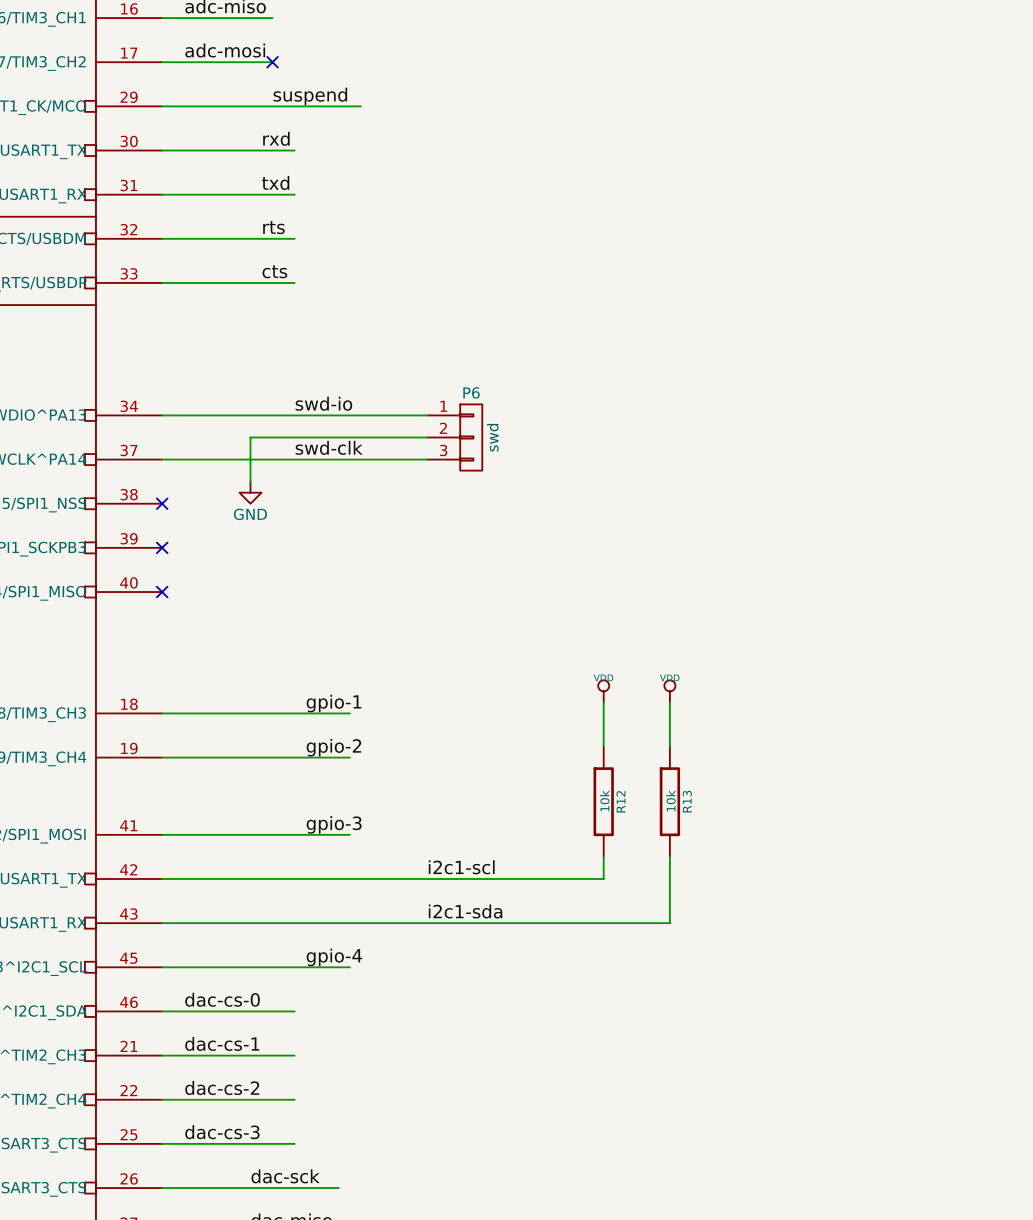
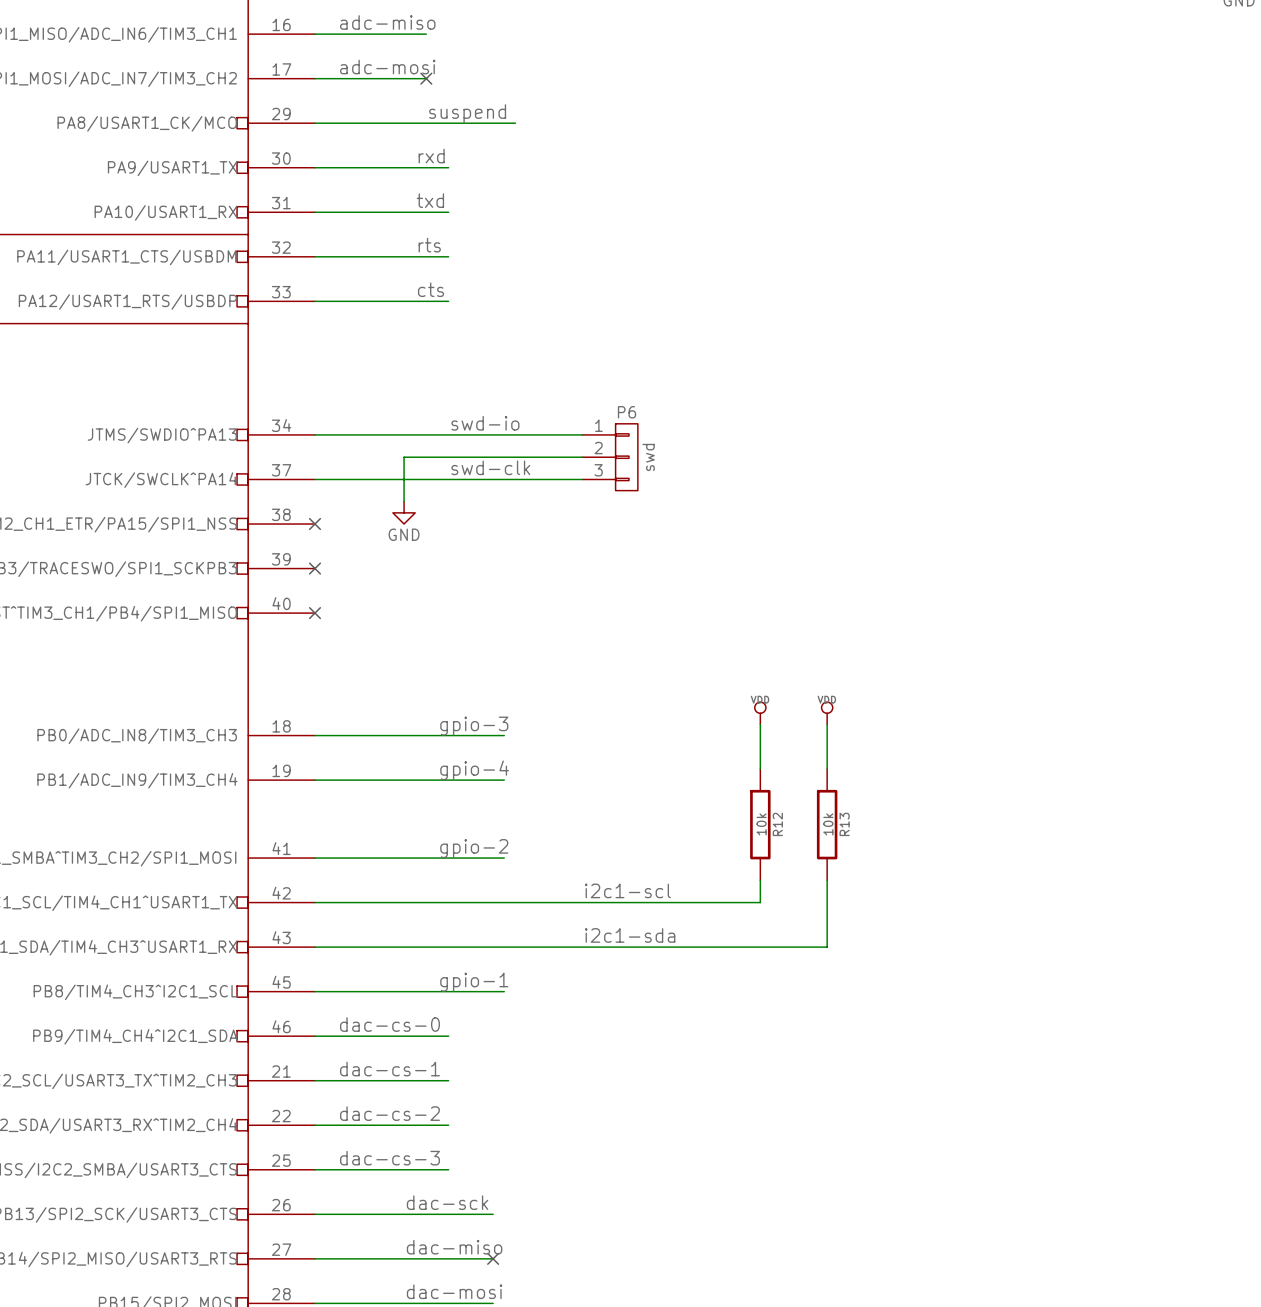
label: gpio-1 (334, 703) -> none
label position: gpio-2 (333, 747) -> gpio-2 (474, 848)
label position: gpio-3 (334, 824) -> gpio-3 (474, 726)
label: none -> gpio-1 (474, 982)
label position: gpio-4 (334, 957) -> gpio-4 (474, 770)

